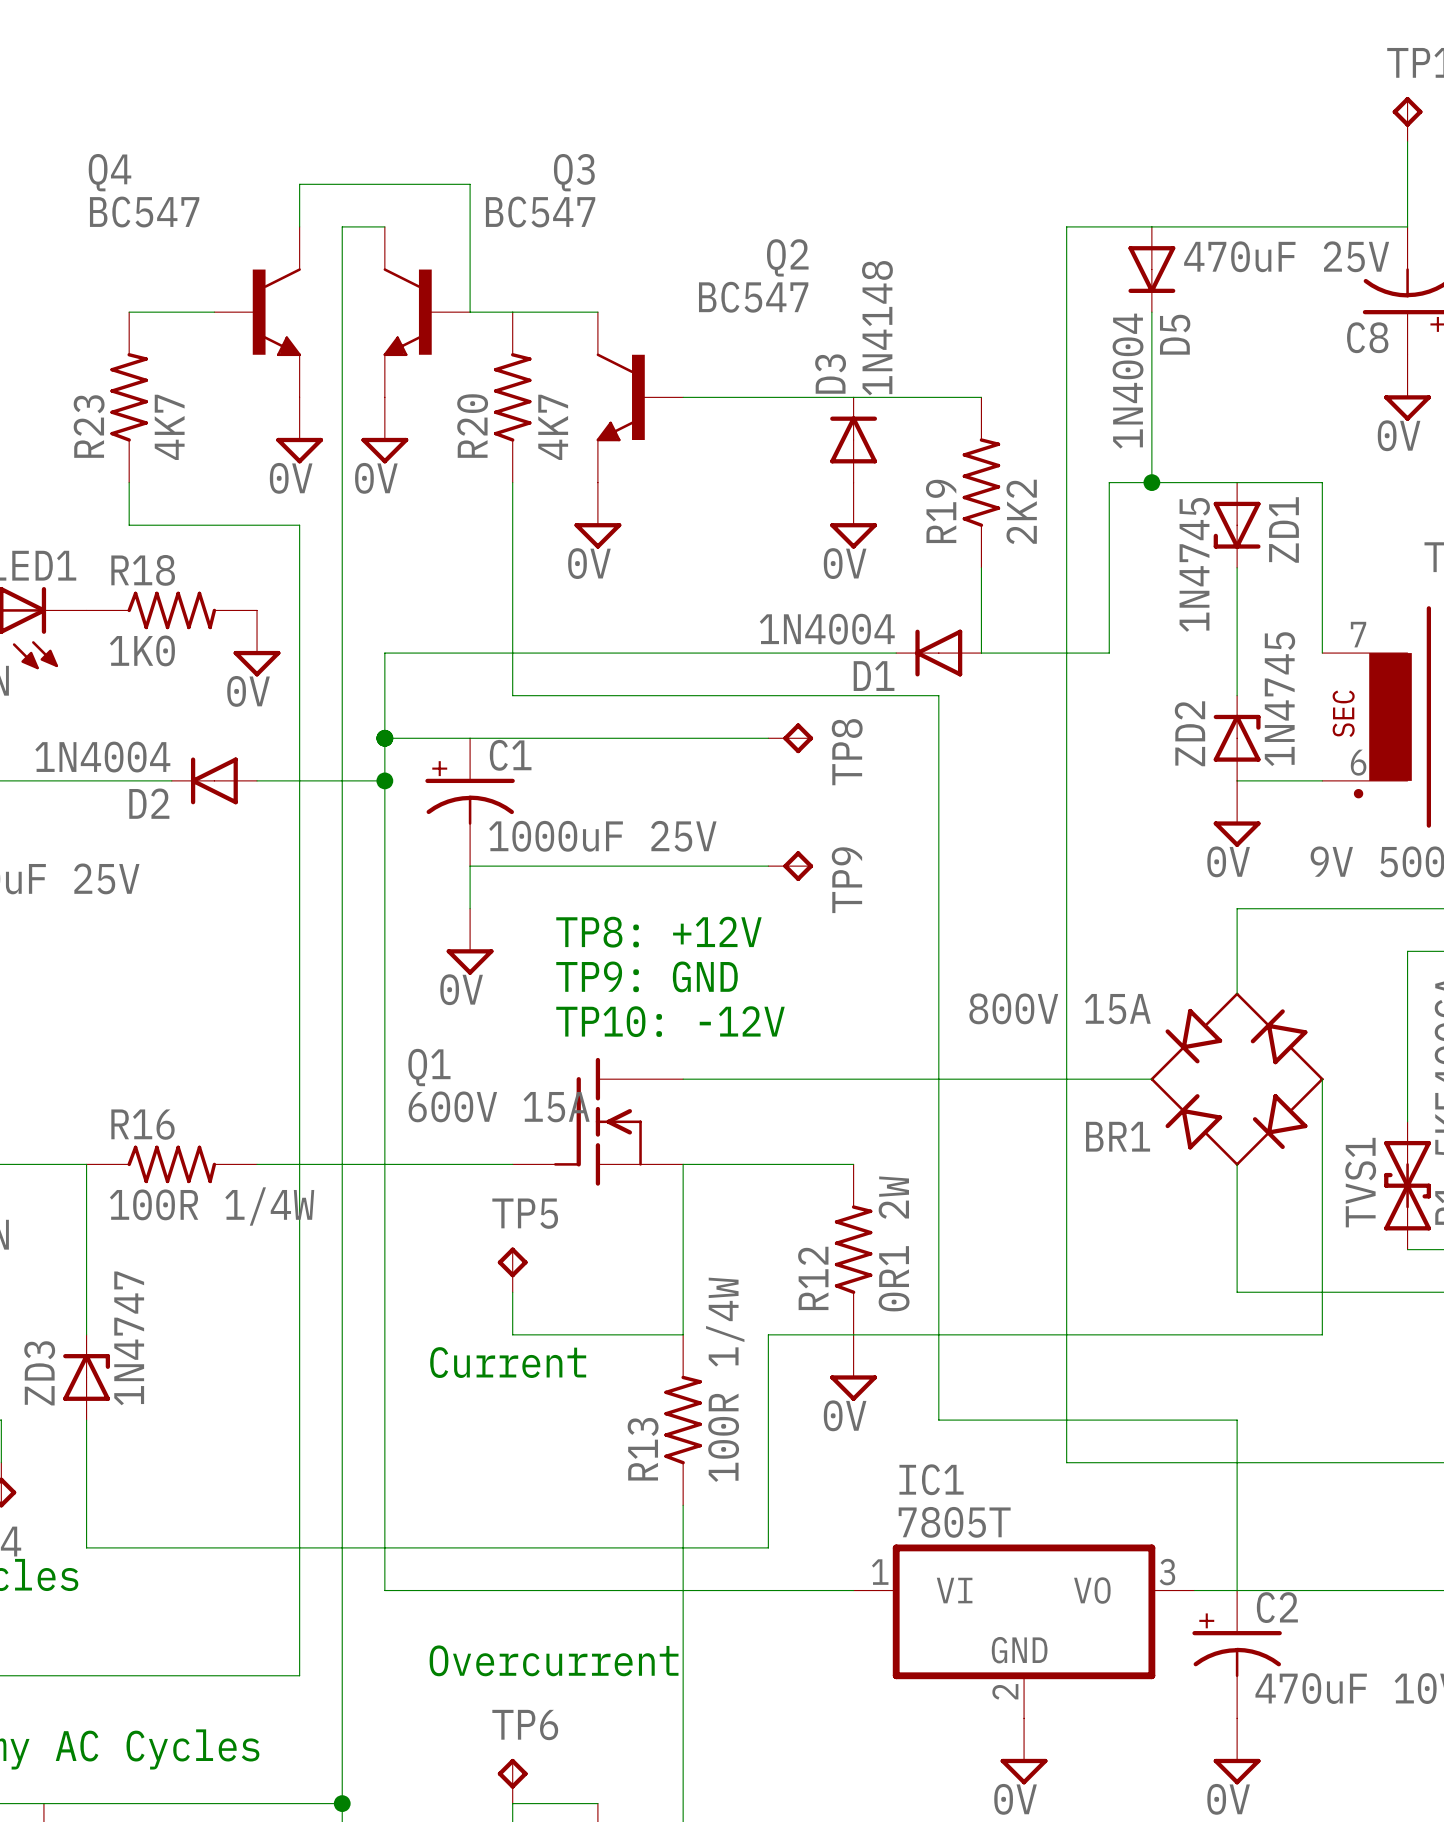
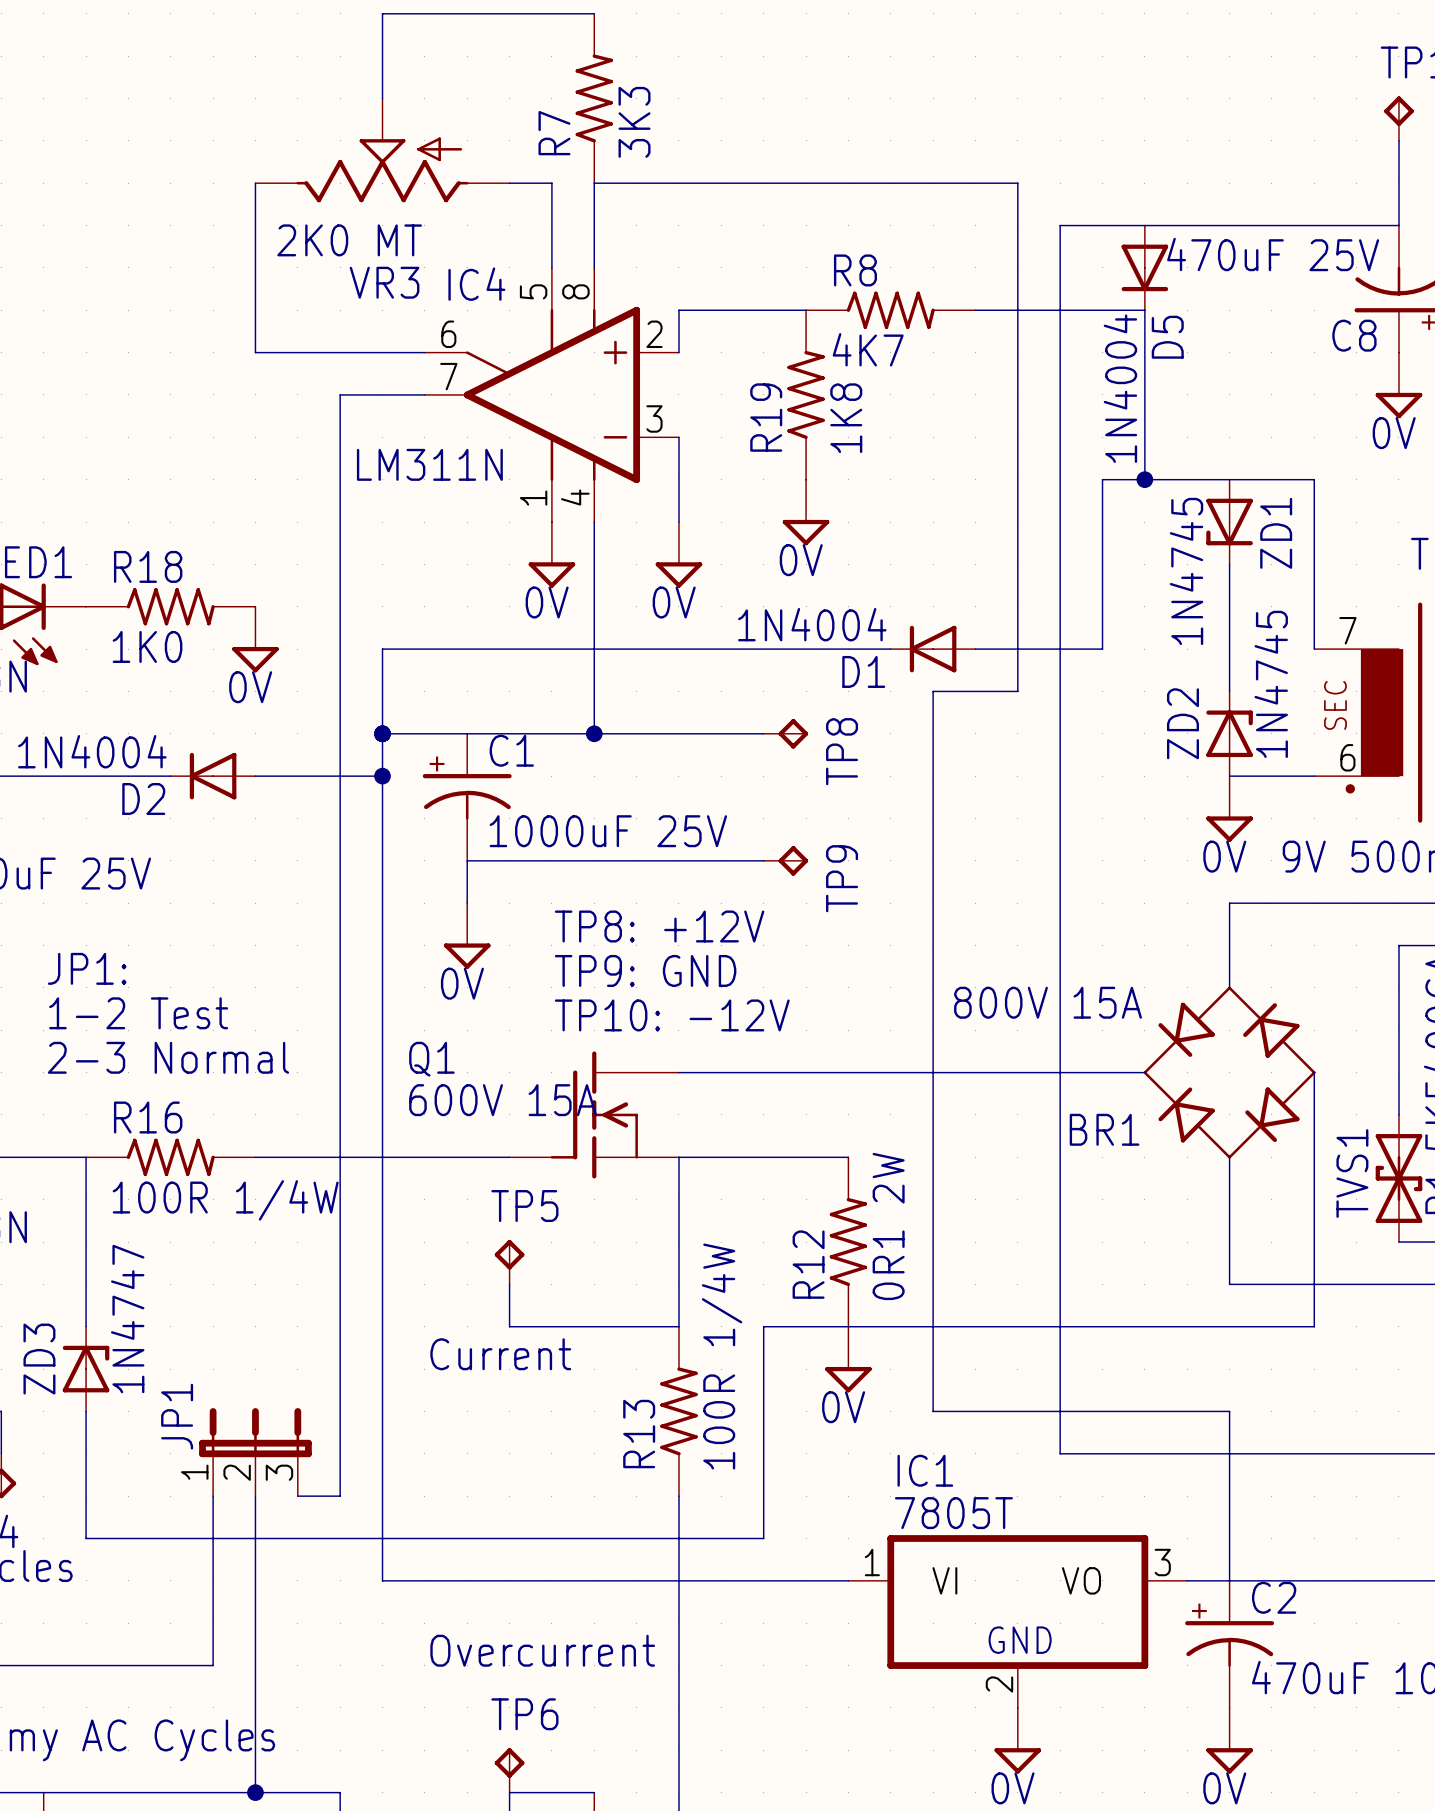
wire: none -> (594, 13) (382, 13) (382, 98)
R7: none -> 3K3 (594, 98)
VR3: none -> 2K0 MT (382, 150)
wire: none -> (255, 183) (255, 352) (424, 352)
wire: none -> (509, 183) (551, 183) (551, 267)
wire: (299, 226) (299, 184) (470, 184) (470, 312) (597, 312) -> none
wire: (384, 226) (342, 226) (342, 397) -> (424, 394) (340, 394)
wire: (129, 312) (214, 312) -> none
Q4: BC547 (257, 312) -> none
Q3: BC547 (426, 312) -> none
wire: none -> (806, 310) (678, 310) (678, 352)
R8: none -> 4K7 (890, 310)
wire: none -> (975, 310) (1144, 310)
R23: 4K7 (129, 397) -> none
R20: 4K7 (512, 397) -> none
IC4: none -> LM311N (551, 394)
Q2: BC547 (639, 397) -> none
wire: (683, 397) (981, 397) -> none
power symbol: 0V (299, 430) -> none
power symbol: 0V (384, 430) -> none
D3: 1N4148 (853, 439) -> none
wire: (129, 482) (129, 525) (299, 525) (299, 1675) (214, 1675) -> (213, 1496) (213, 1665)
wire: (512, 482) (512, 695) (938, 695) -> (594, 267) (594, 183) (1017, 183) (1017, 691) (933, 691)
R19 position: (981, 482) -> (806, 394)
R19 value: 2K2 (1021, 511) -> 1K8 (846, 418)
power symbol: 0V (597, 515) -> none
power symbol position: 0V (853, 515) -> 0V (806, 512)
wire: none -> (594, 522) (594, 733)
power symbol: none -> 0V (551, 554)
power symbol: none -> 0V (678, 554)
wire: (981, 567) (981, 653) -> (678, 437) (678, 522)
junction: none -> (594, 733)
text: none -> JP1: (87, 968)
text: none -> 1-2 Test (138, 1013)
text: none -> 2-3 Normal (168, 1057)
JP1: none -> (255, 1452)
wire: none -> (255, 1496) (255, 1792)
wire: (342, 1505) (342, 1803) -> (340, 1496) (297, 1496)
junction position: (342, 1803) -> (255, 1792)

